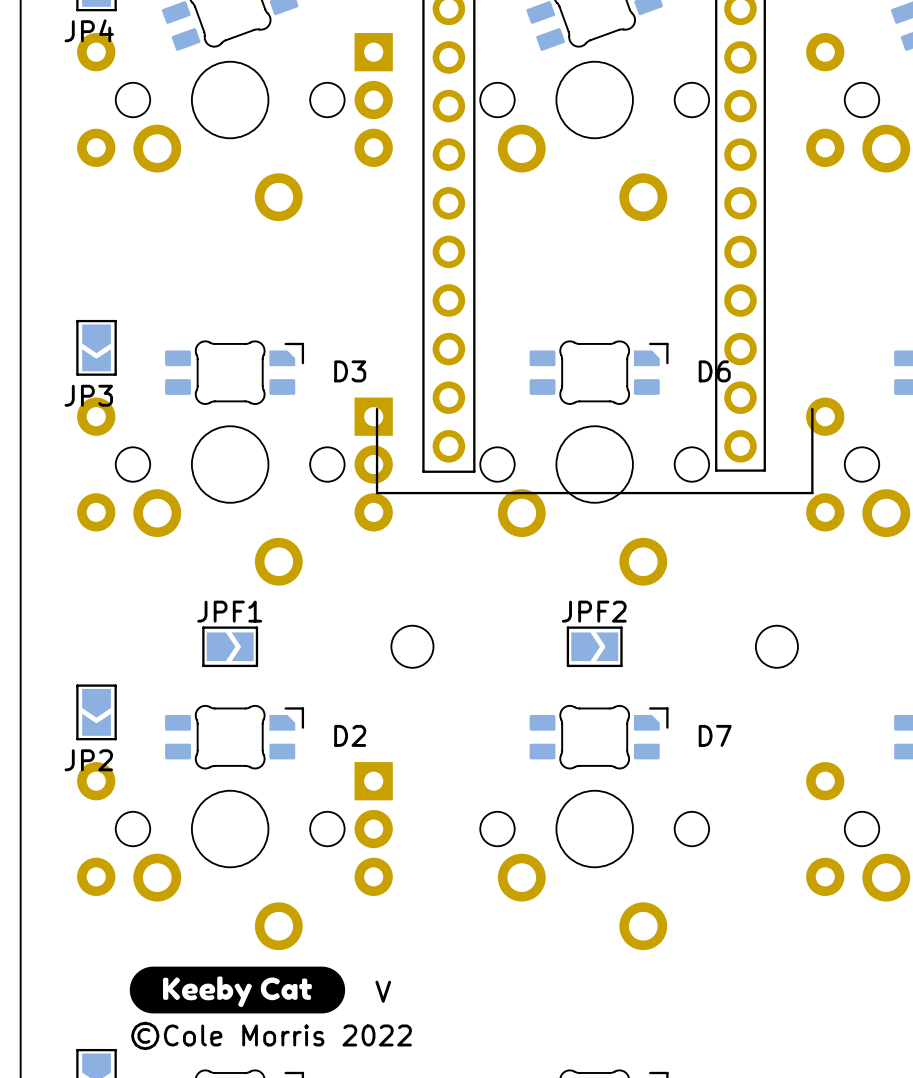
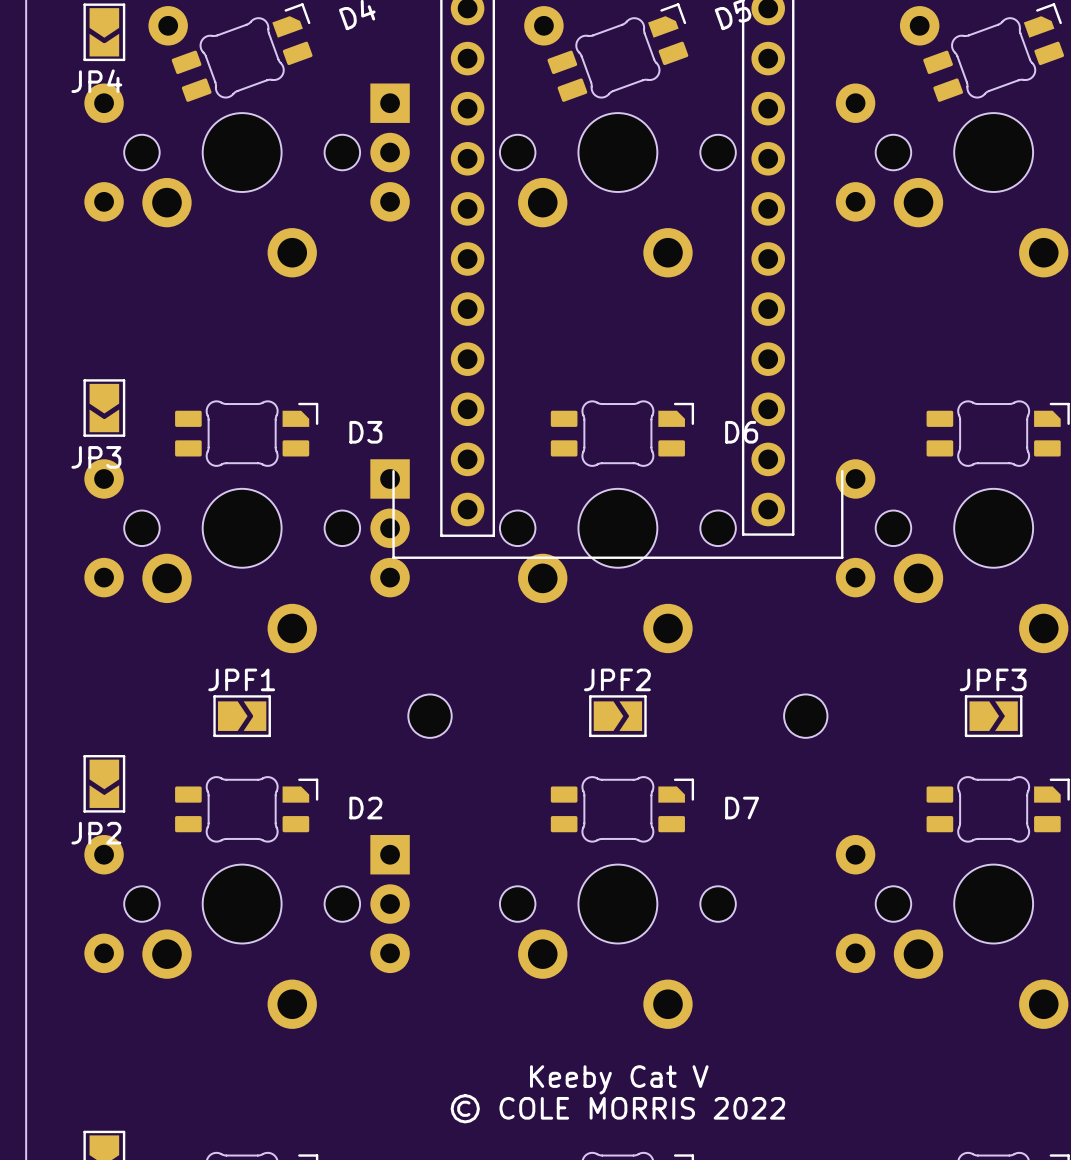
drawing: [129, 966, 346, 1014] -> none
text: V (383, 991) -> none
text: none -> Keeby Cat V (619, 1079)
text: none -> © COLE MORRIS 2022 (617, 1108)
text: ©Cole Morris 2022 (271, 1035) -> none

